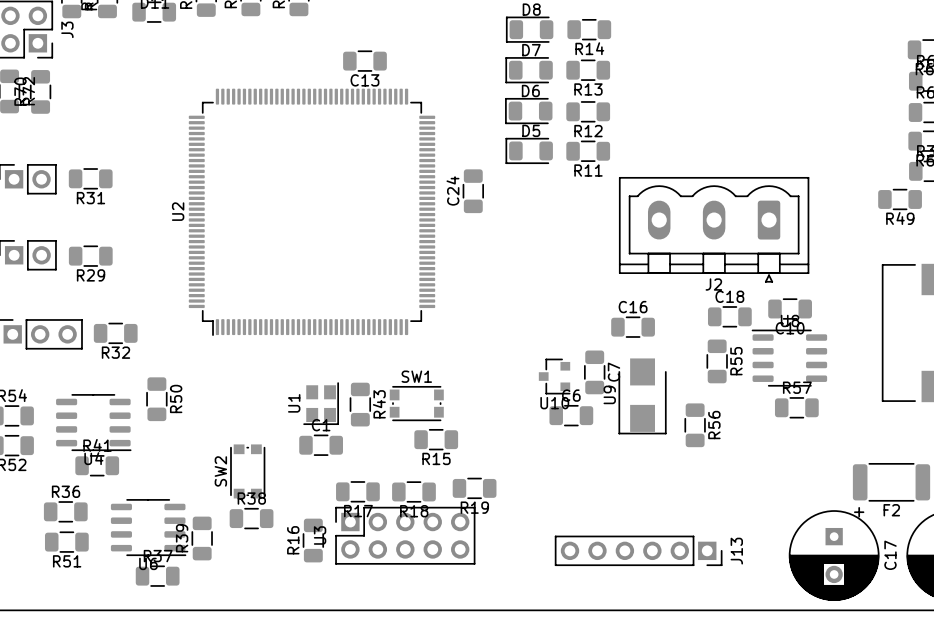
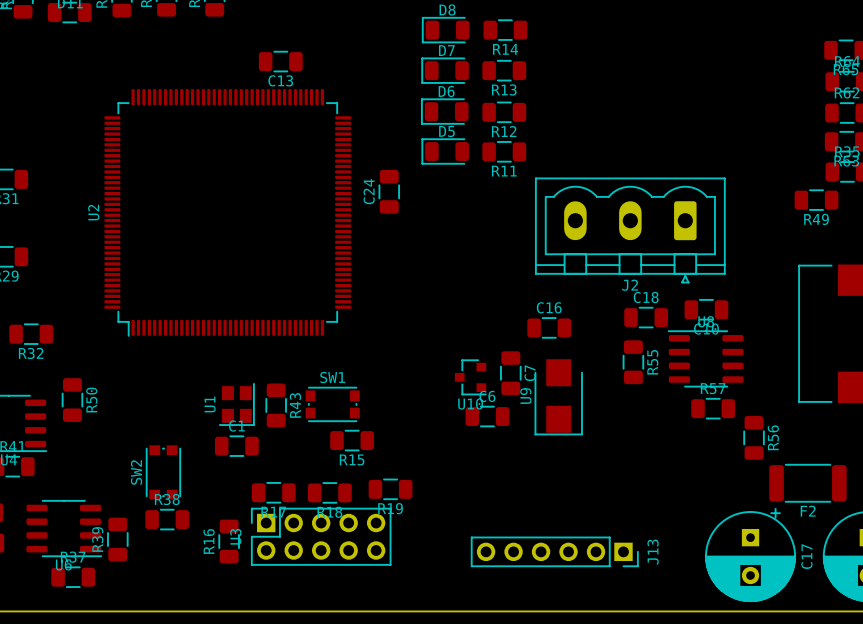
R56 position: (695, 425) -> (754, 437)

